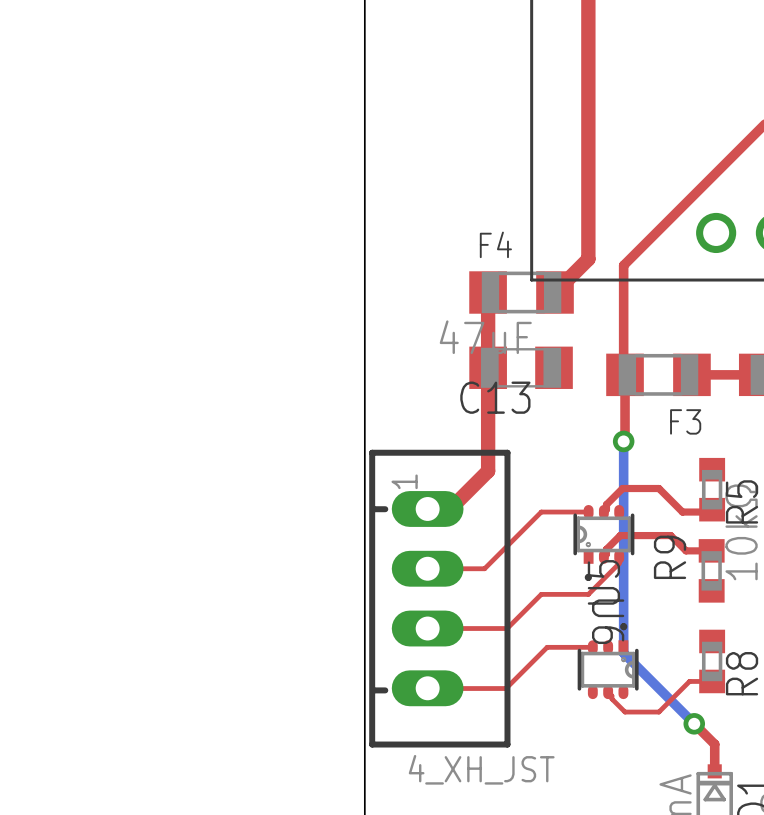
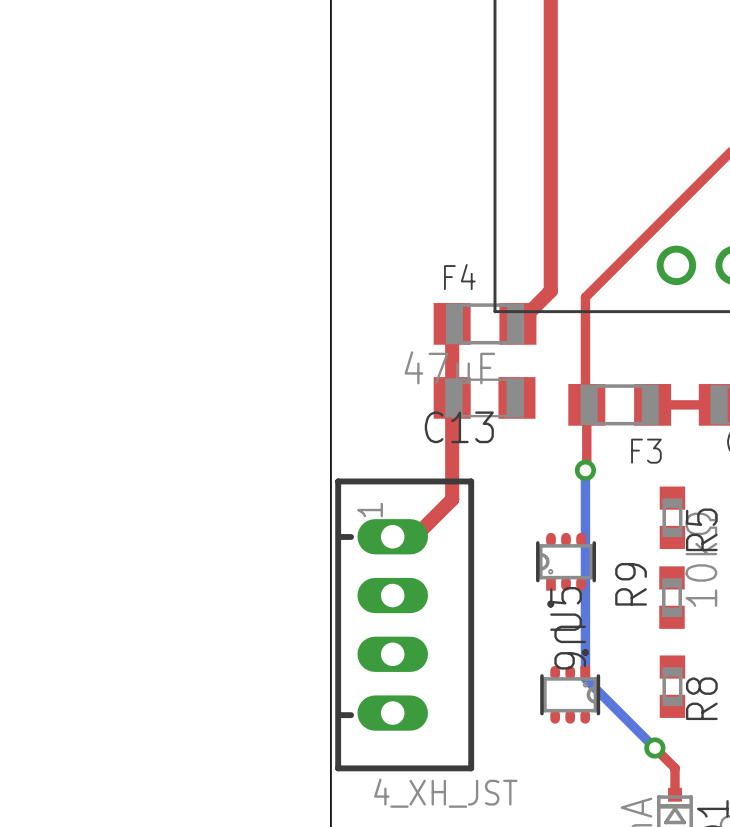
top track: (712, 509) (709, 512) (682, 512) (658, 488) (622, 488) (606, 504) (606, 509) (603, 512) -> none
top track: (588, 512) (541, 512) (484, 568) (427, 568) -> none
top track: (711, 550) (686, 550) (670, 535) (620, 535) (606, 549) (606, 554) (603, 556) -> none
top track: (619, 556) (619, 563) (588, 594) (541, 594) (507, 628) (427, 628) -> none
top track: (592, 647) (547, 647) (506, 688) (427, 688) -> none
top track: (712, 681) (689, 681) (658, 712) (625, 712) (611, 698) (608, 692) -> none

